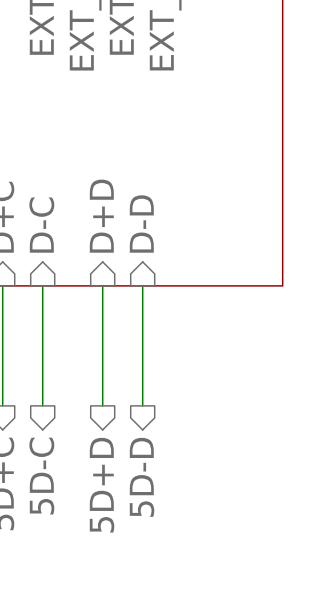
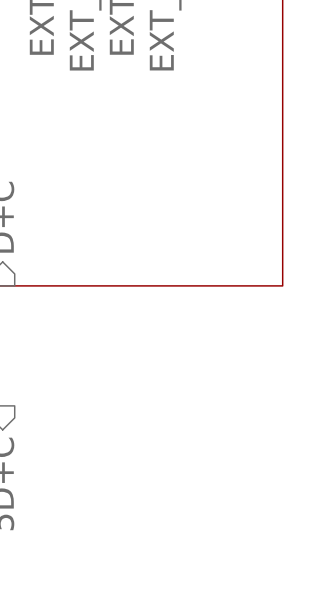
sheet pin: D+D (101, 216) -> none
sheet pin: D-D (141, 223) -> none
sheet pin: D-C (41, 225) -> none
wire: (2, 285) (2, 405) -> none
wire: (42, 285) (42, 405) -> none
wire: (102, 285) (102, 405) -> none
wire: (142, 285) (142, 405) -> none
hierarchical label: 5D-C (41, 476) -> none
hierarchical label: 5D-D (142, 477) -> none
hierarchical label: 5D+D (102, 485) -> none

